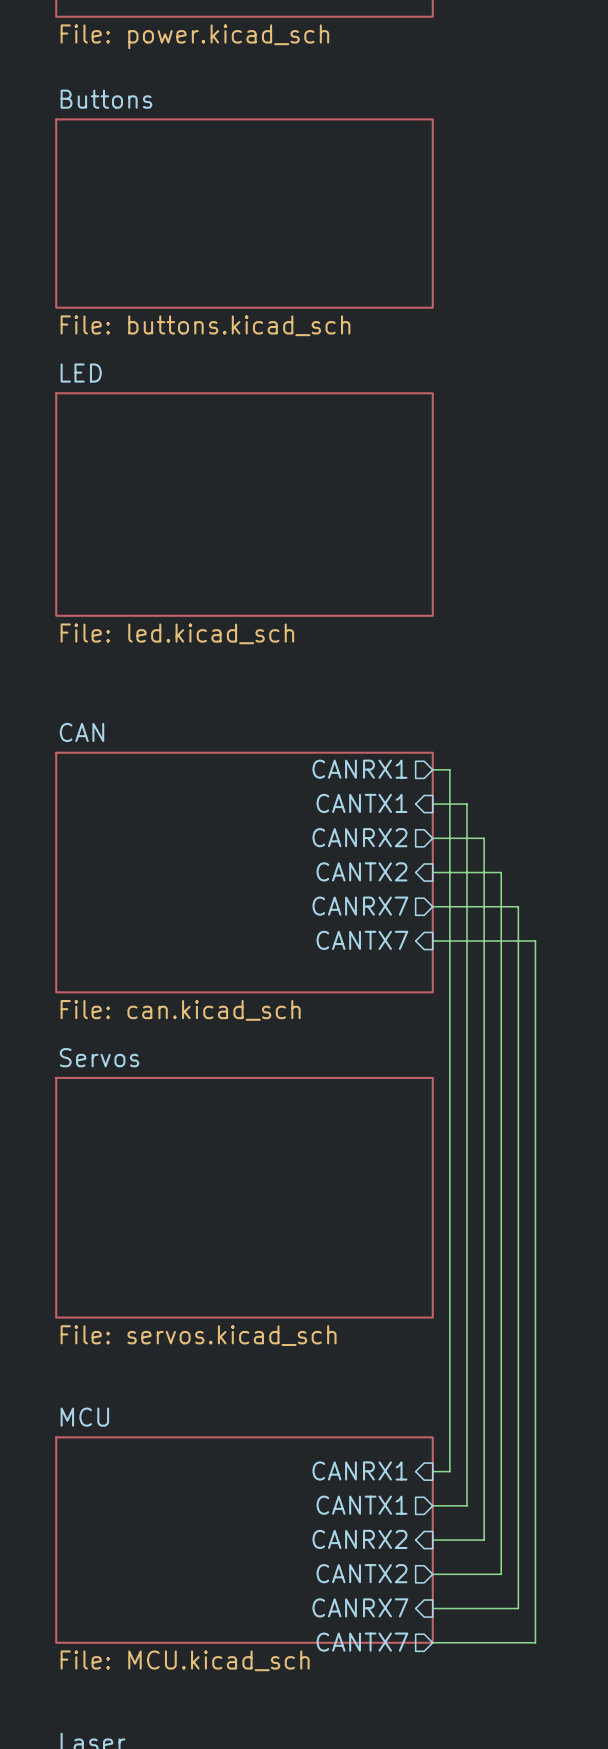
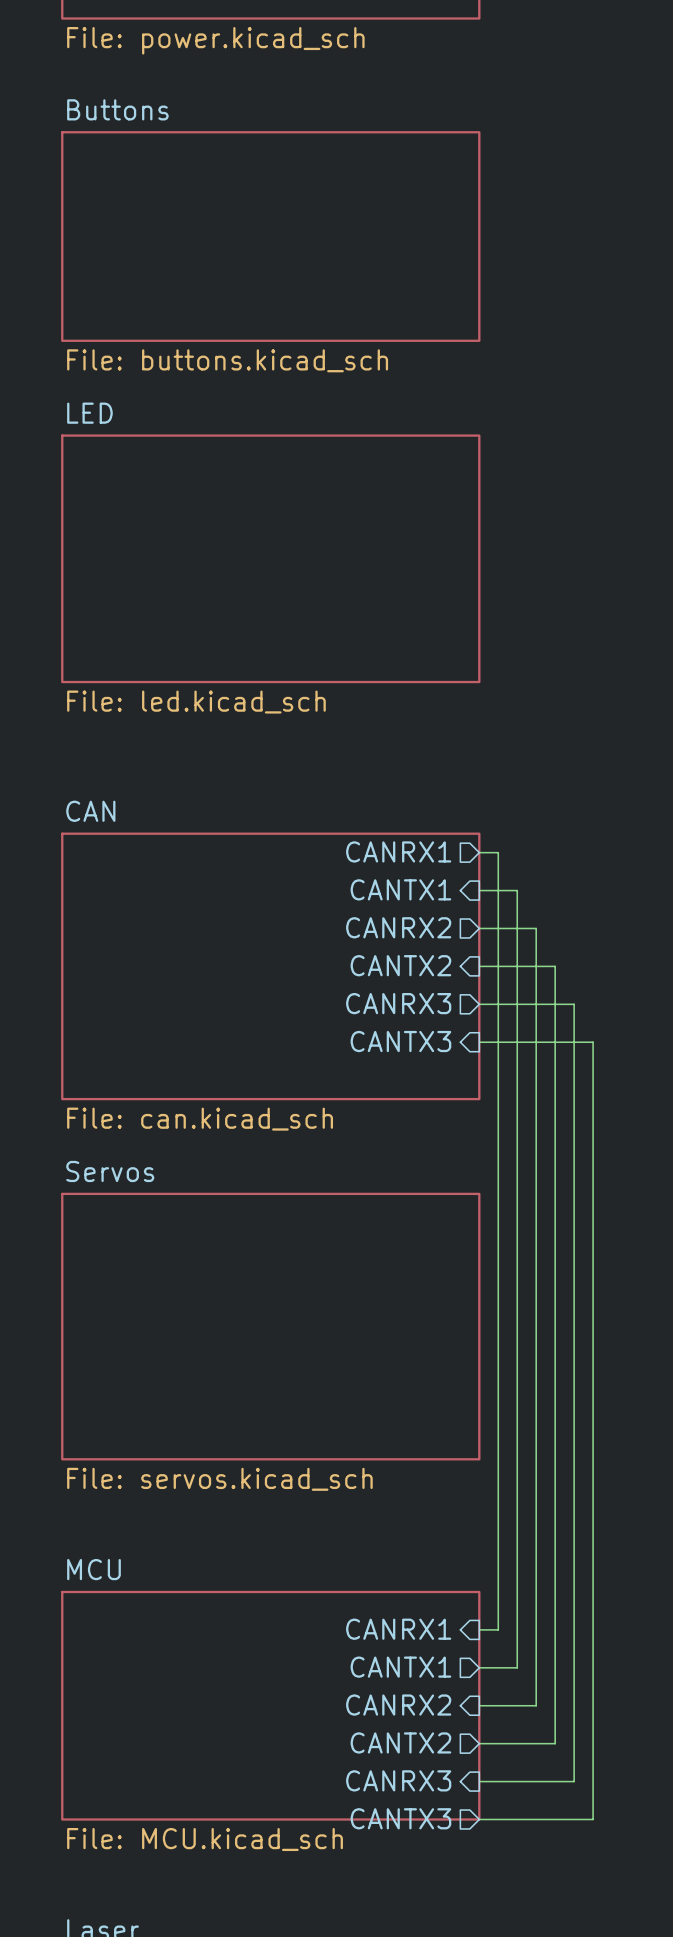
sheet pin: CANRX7 (360, 906) -> CANRX3 (398, 1003)
sheet pin: CANTX7 (362, 940) -> CANTX3 (400, 1041)
sheet pin: CANRX7 (360, 1607) -> CANRX3 (398, 1780)
sheet pin: CANTX7 (362, 1642) -> CANTX3 (400, 1818)

